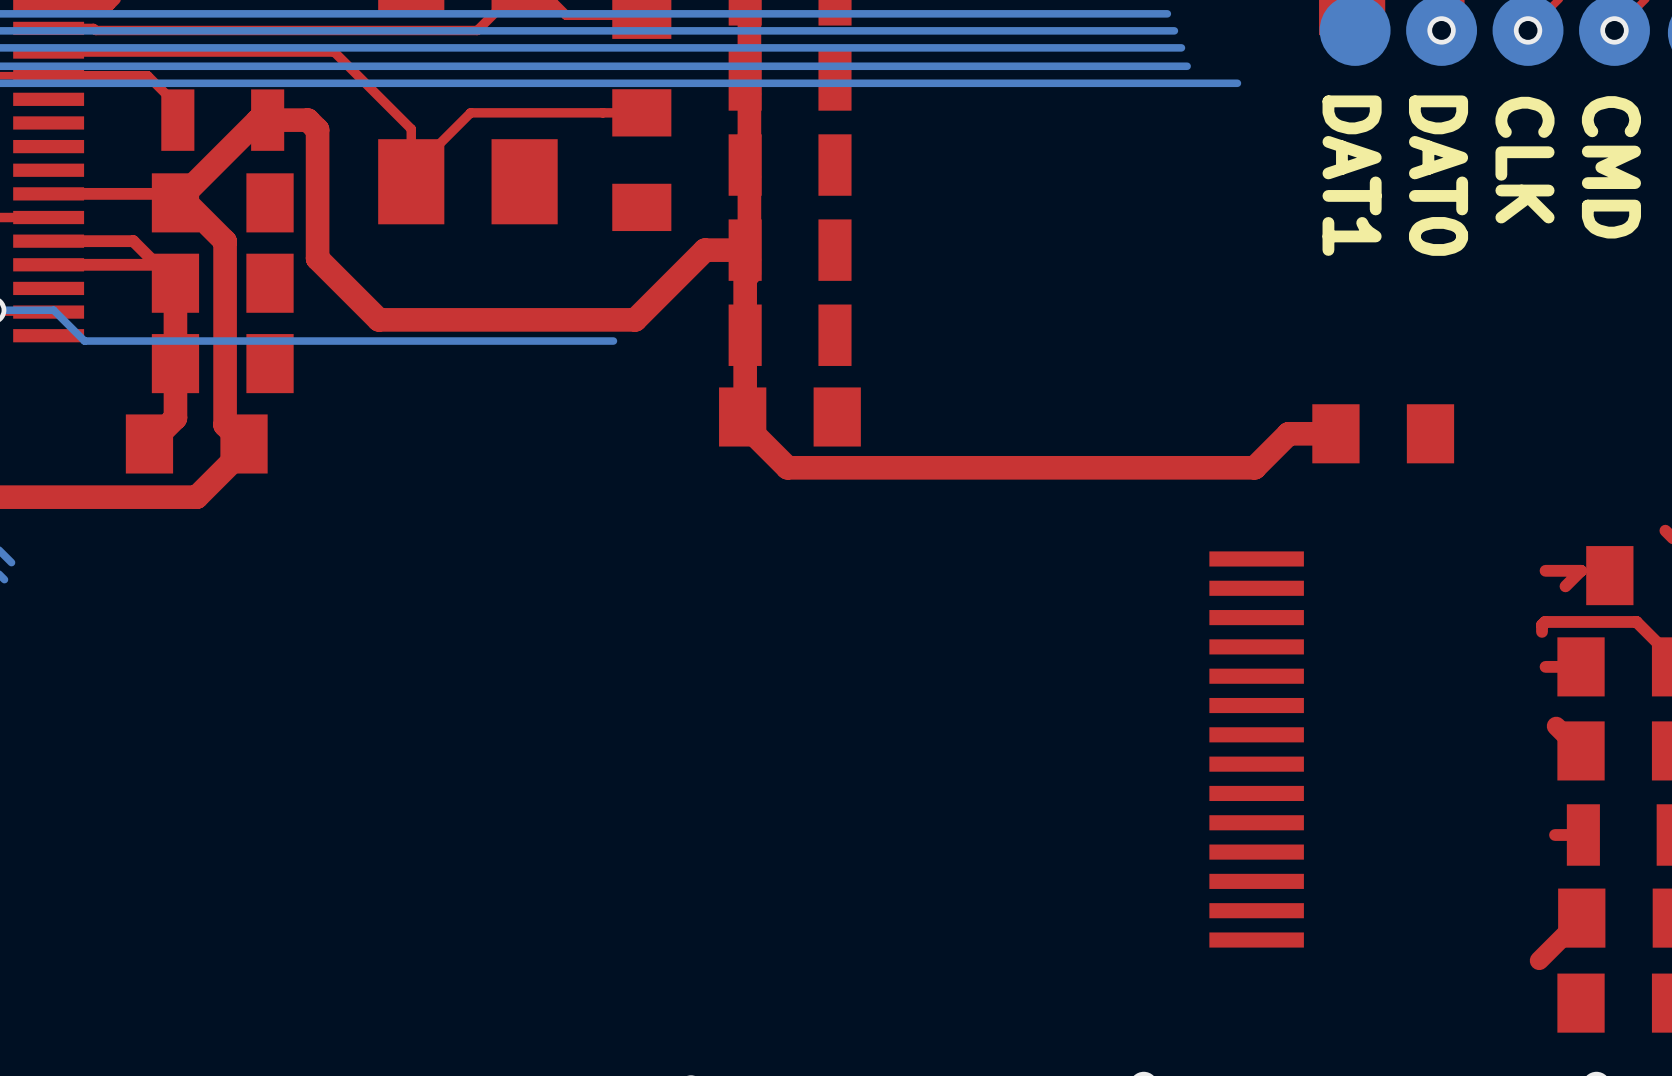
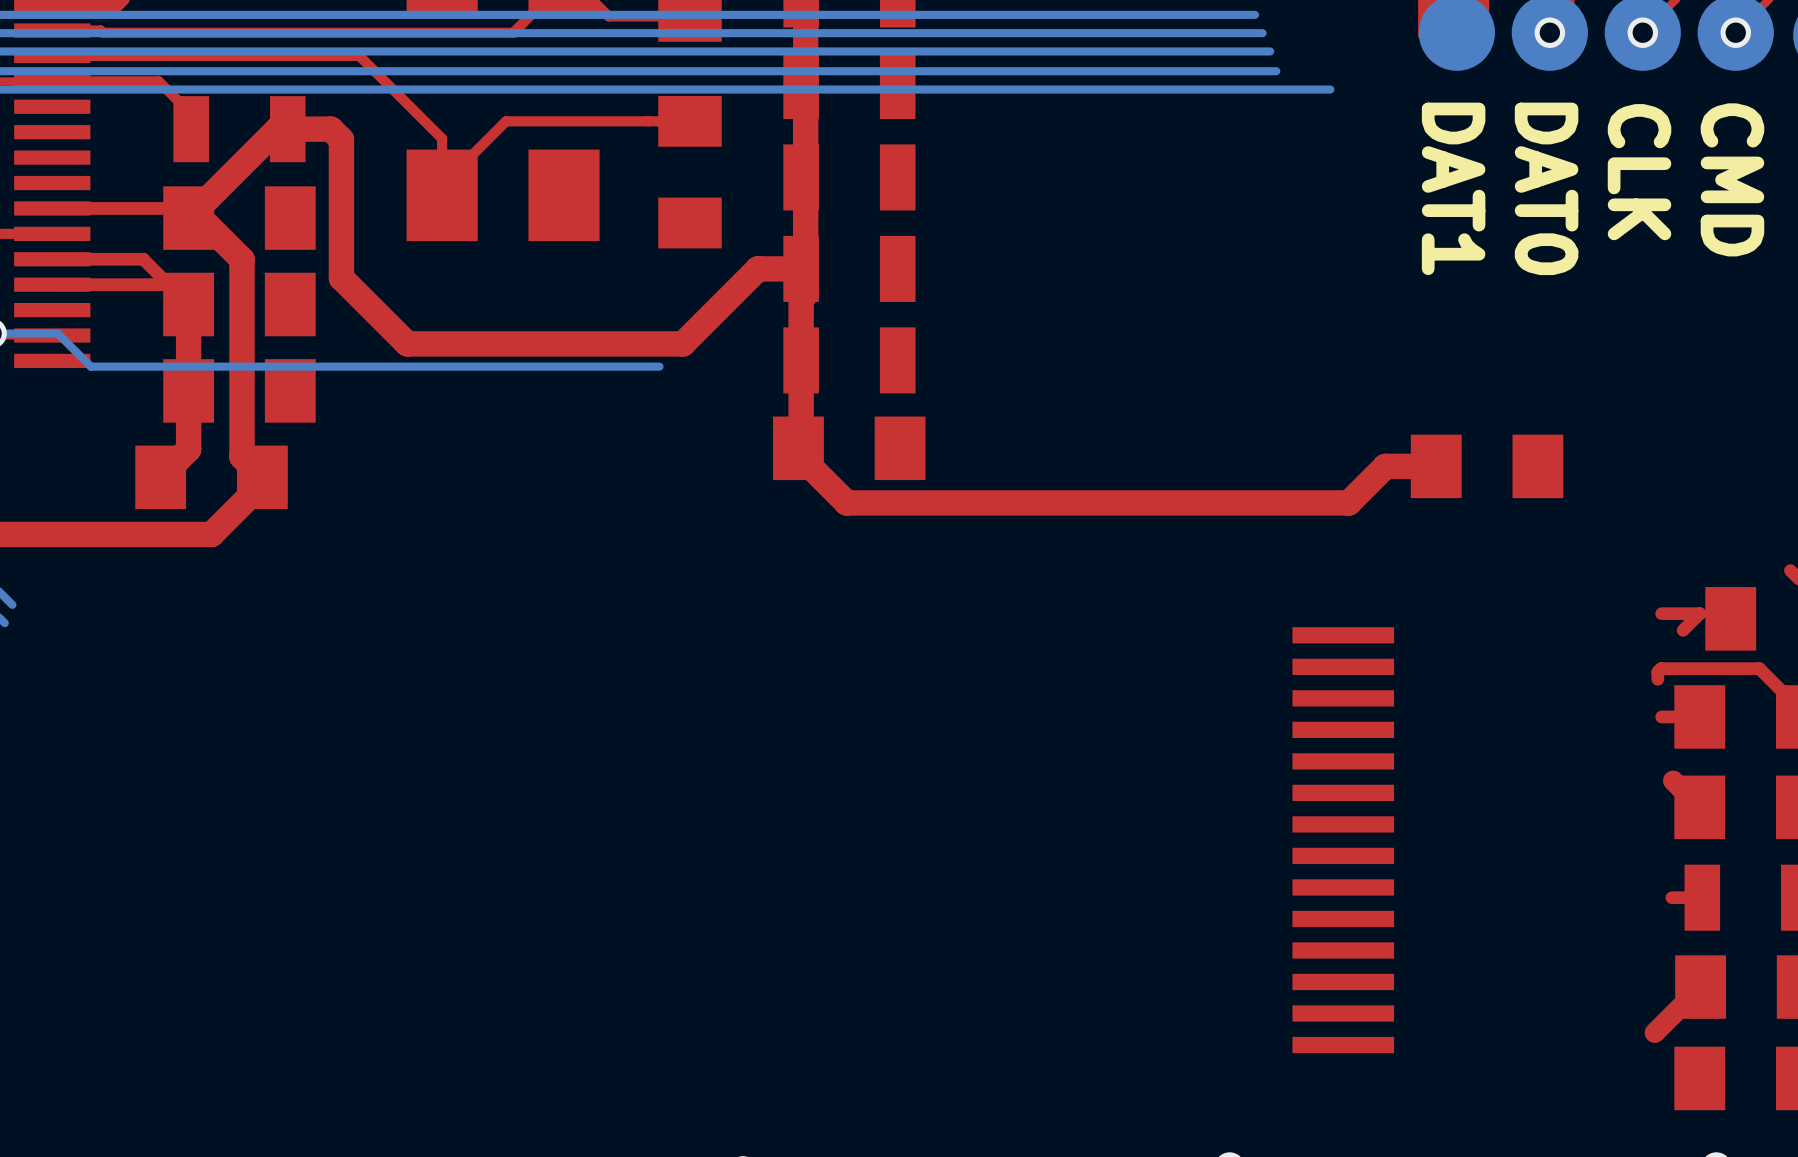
part position: (1256, 749) -> (1343, 840)

